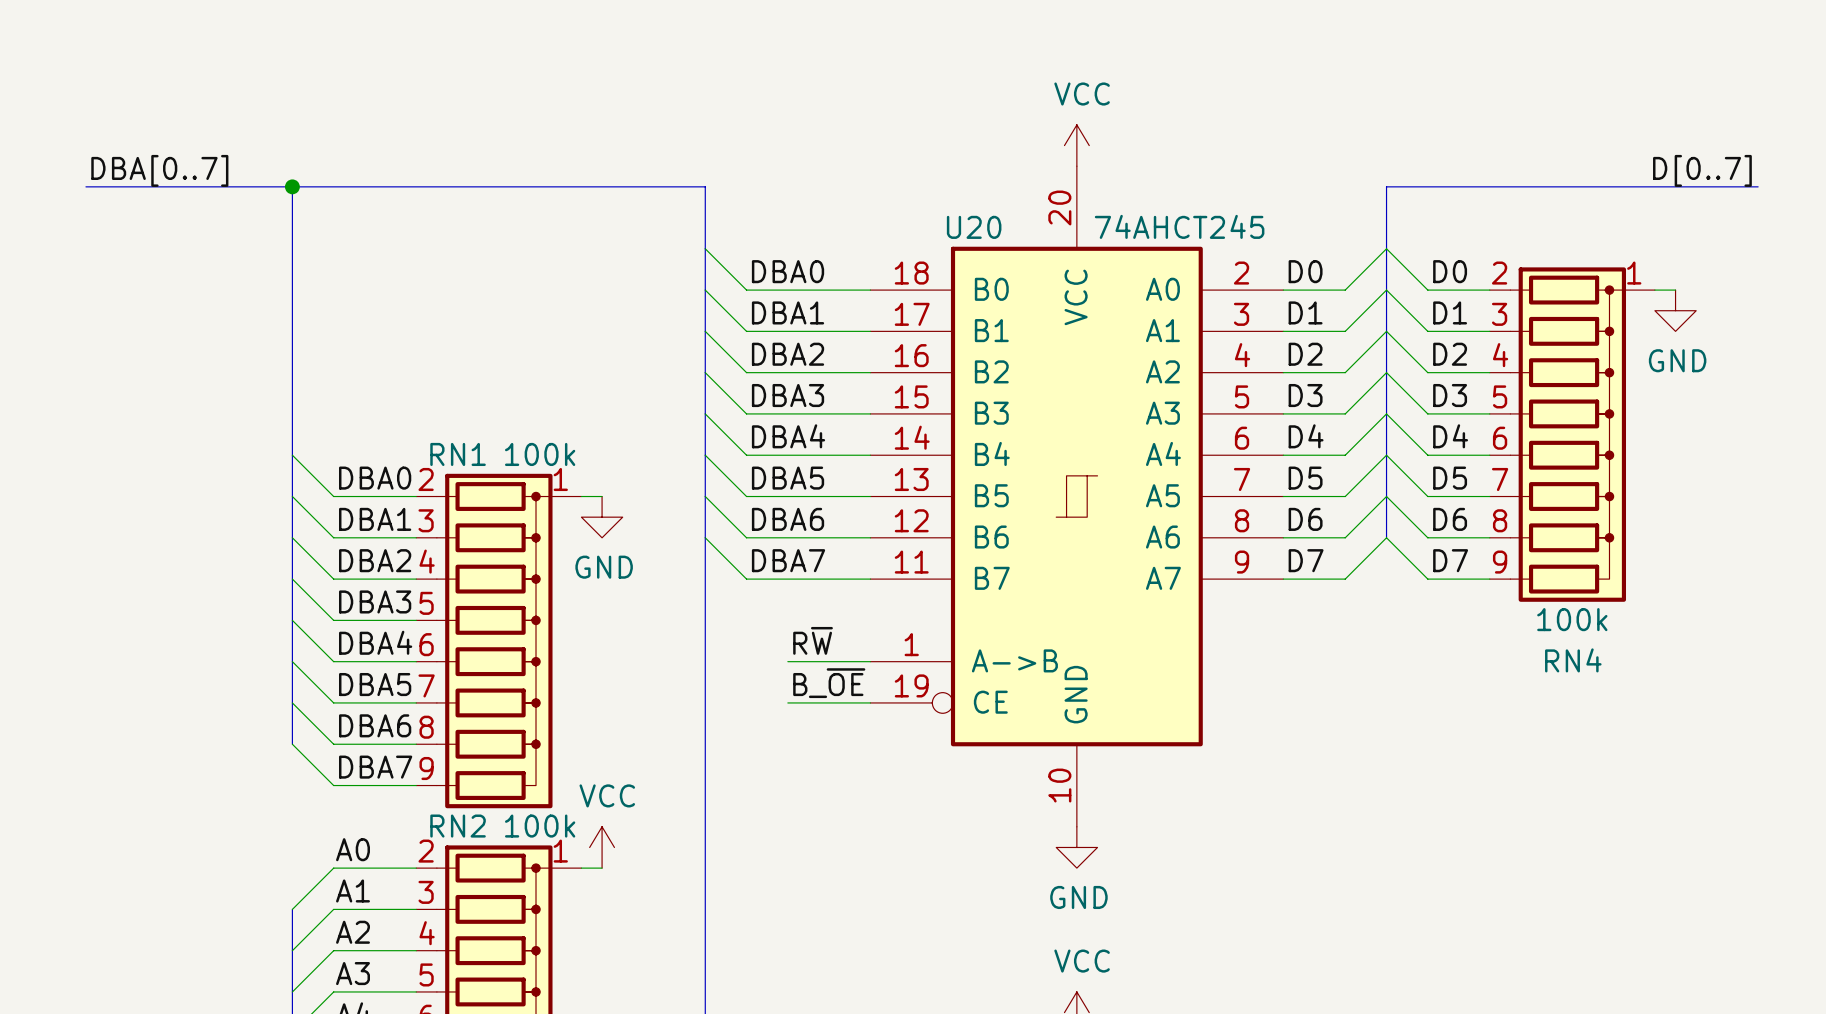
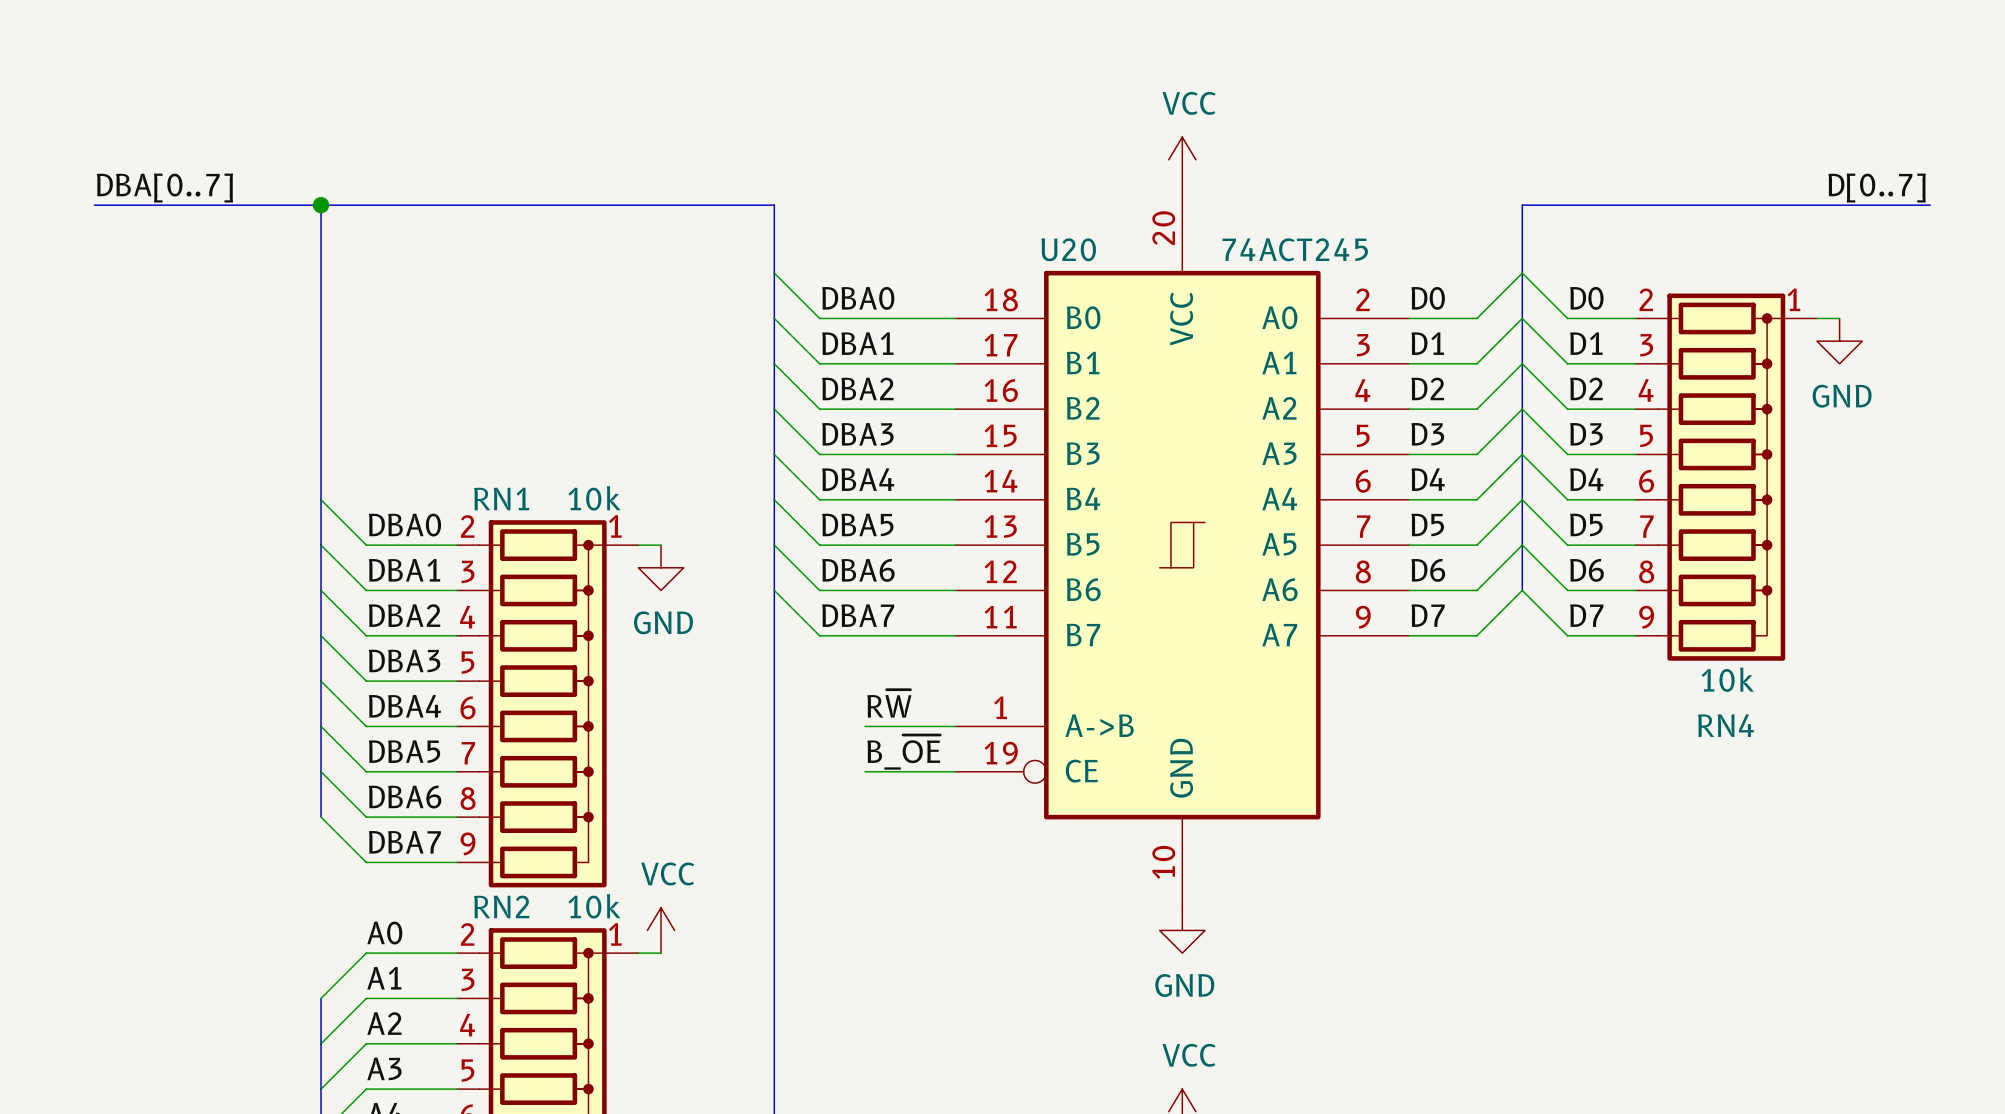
U20 value: 74AHCT245 (1179, 226) -> 74ACT245 (1295, 249)
RN1 value: 100k (540, 454) -> 10k (594, 498)
RN4 value: 100k (1572, 619) -> 10k (1727, 679)
RN2 value: 100k (540, 826) -> 10k (594, 906)

